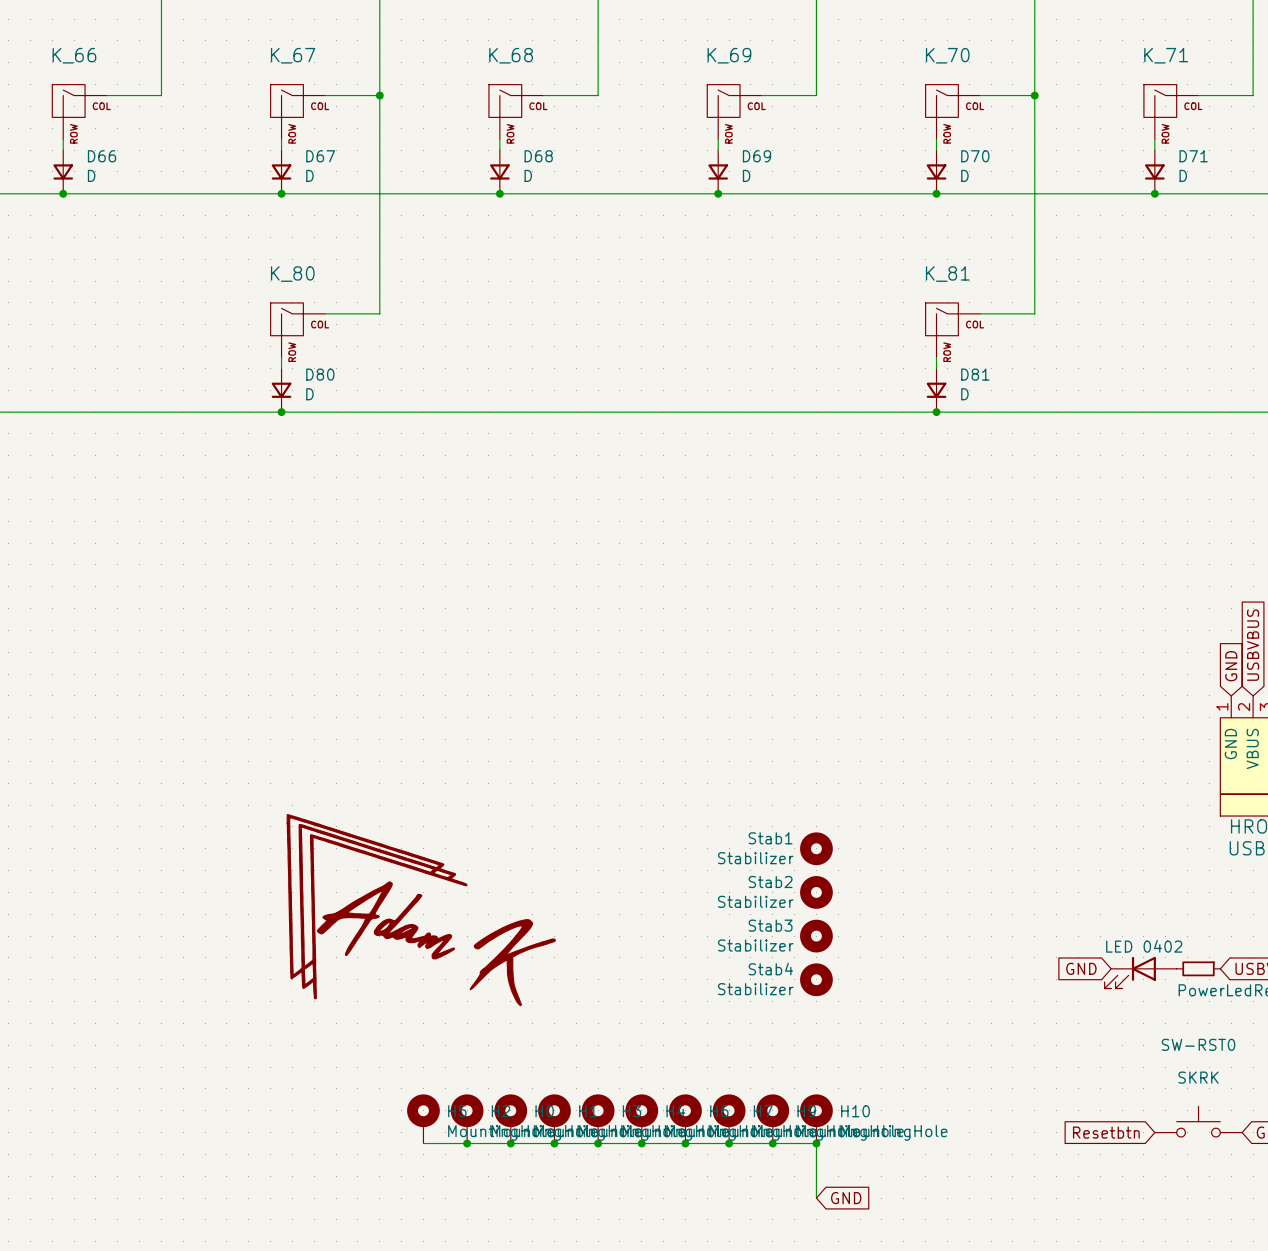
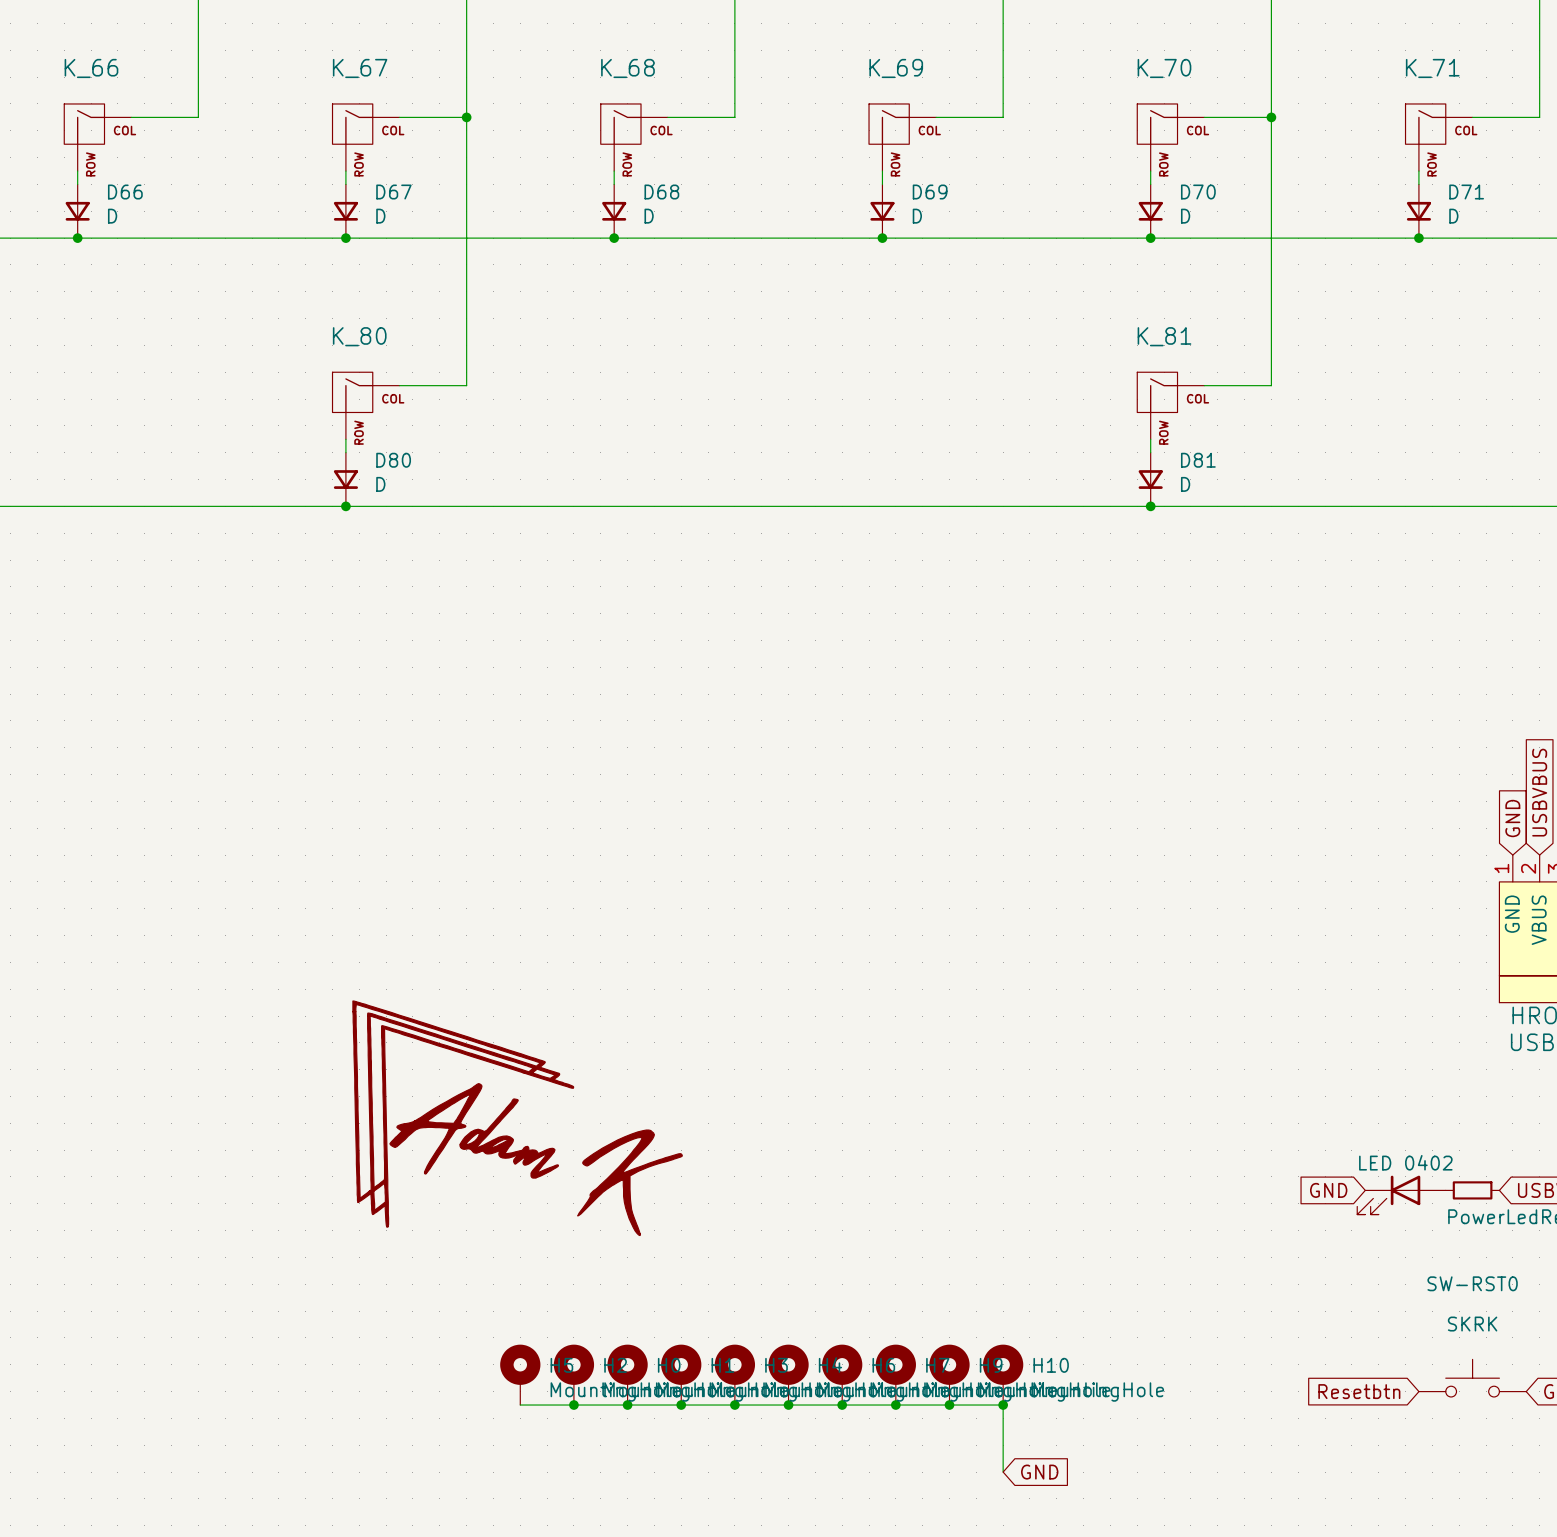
Stab1: Stabilizer (816, 848) -> none
Stab2: Stabilizer (816, 892) -> none
Stab3: Stabilizer (816, 936) -> none
Stab4: Stabilizer (816, 979) -> none

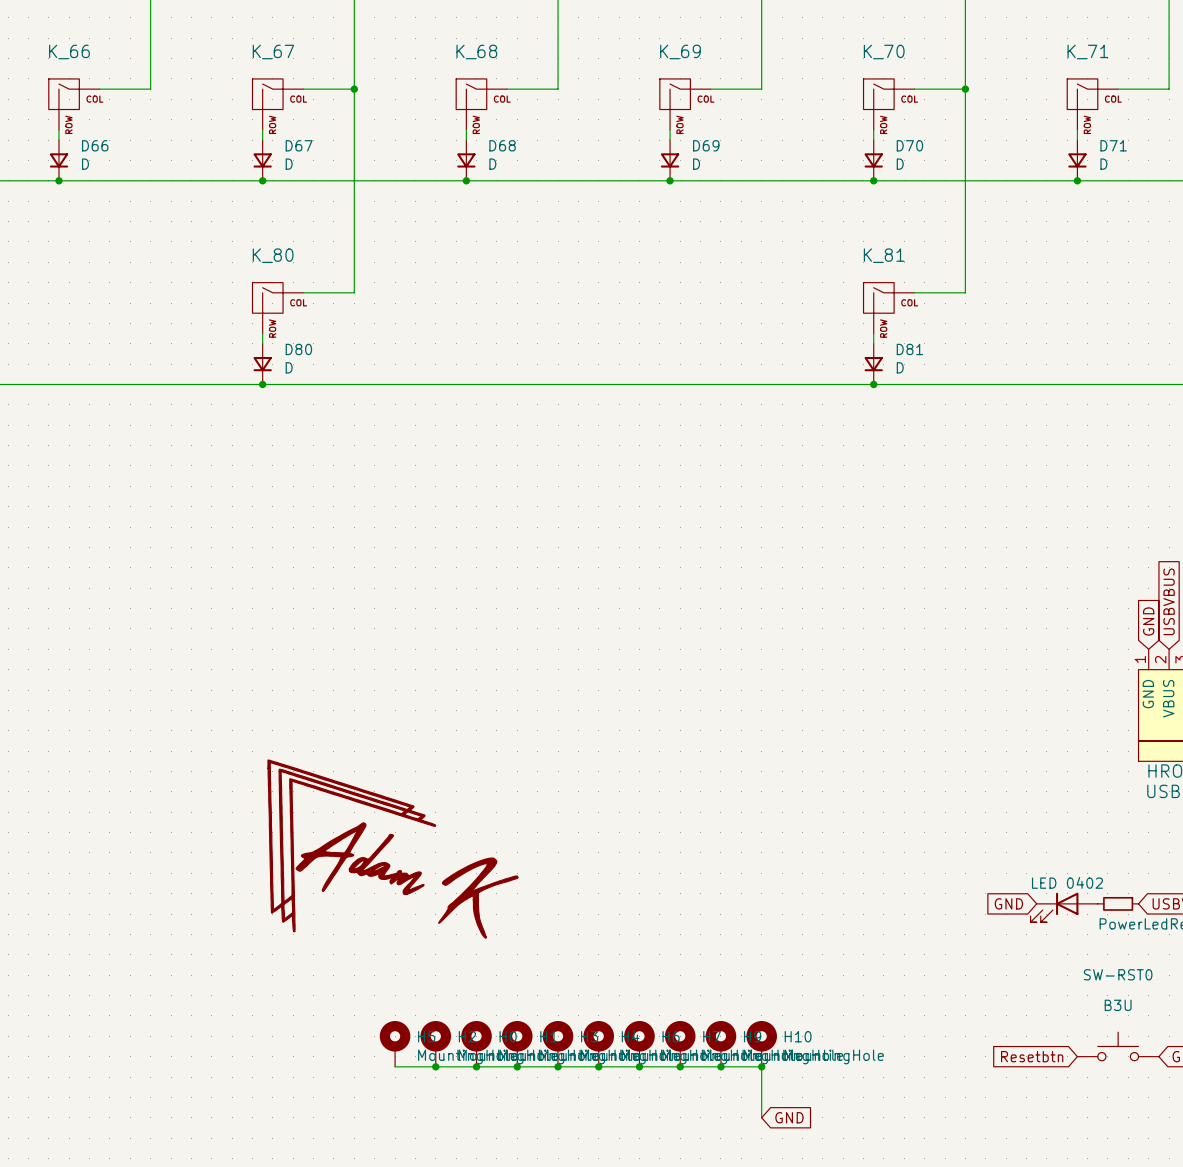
SW-RST0 value: SKRK (1472, 1324) -> B3U (1118, 1005)

